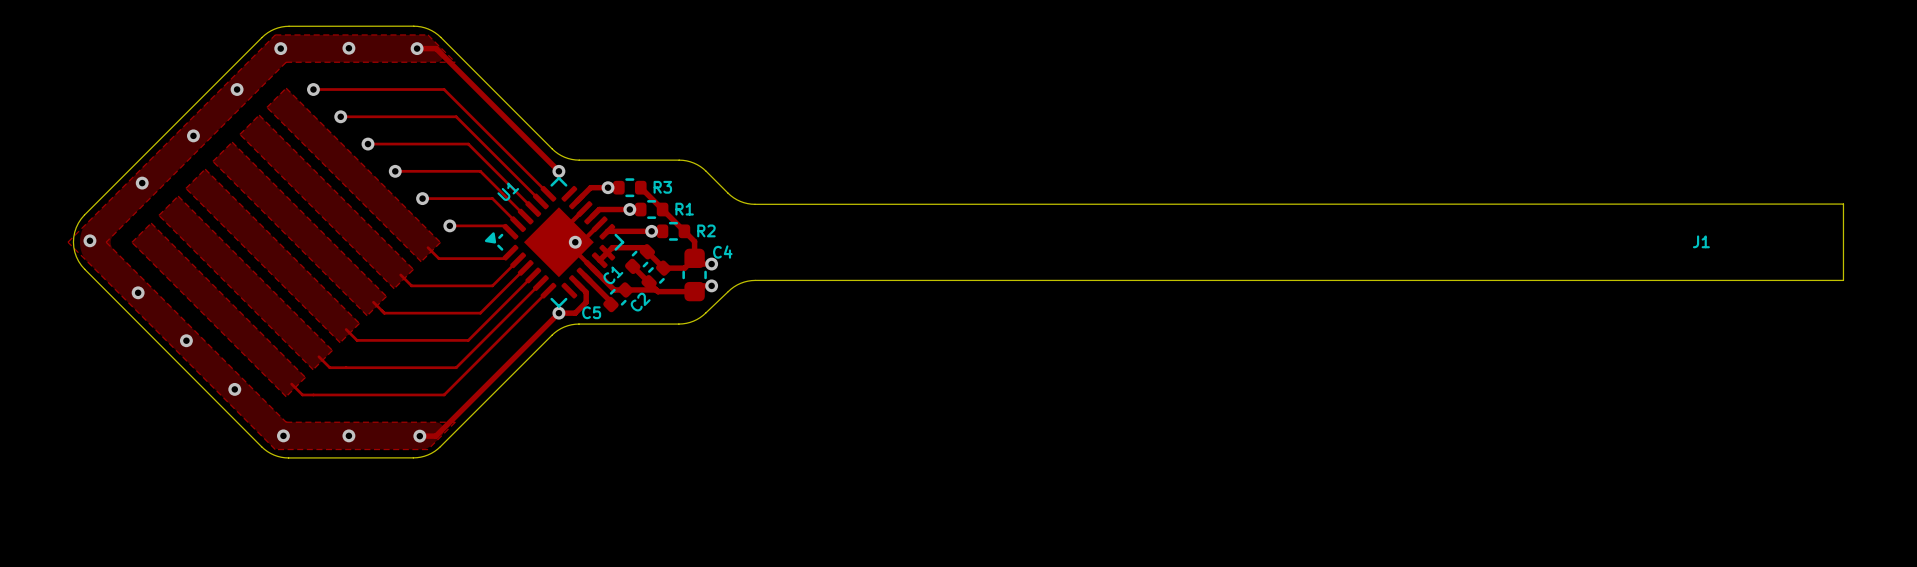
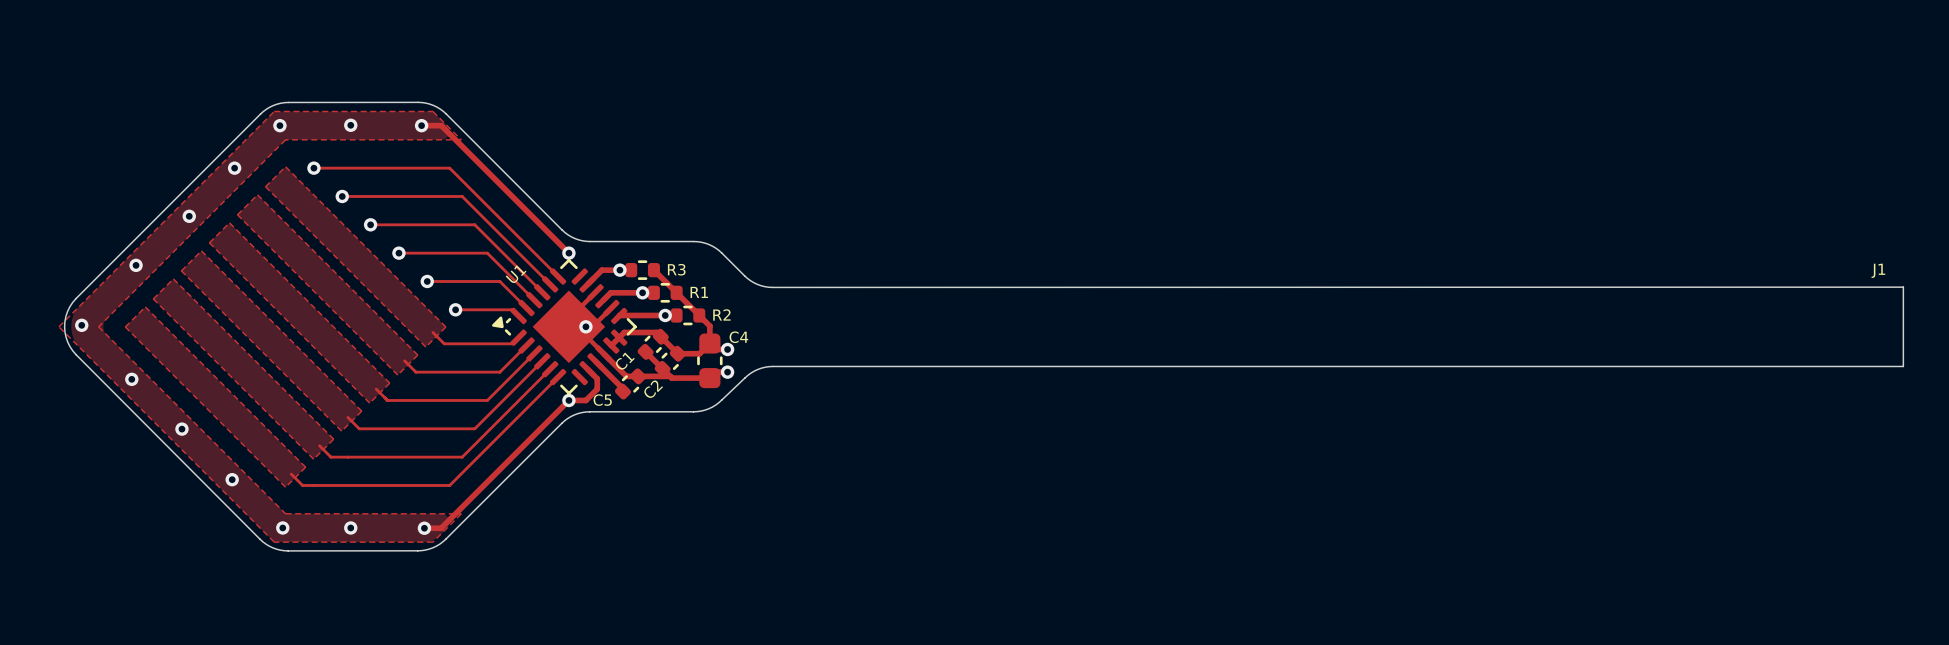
J1 position: (1701, 241) -> (1878, 270)

